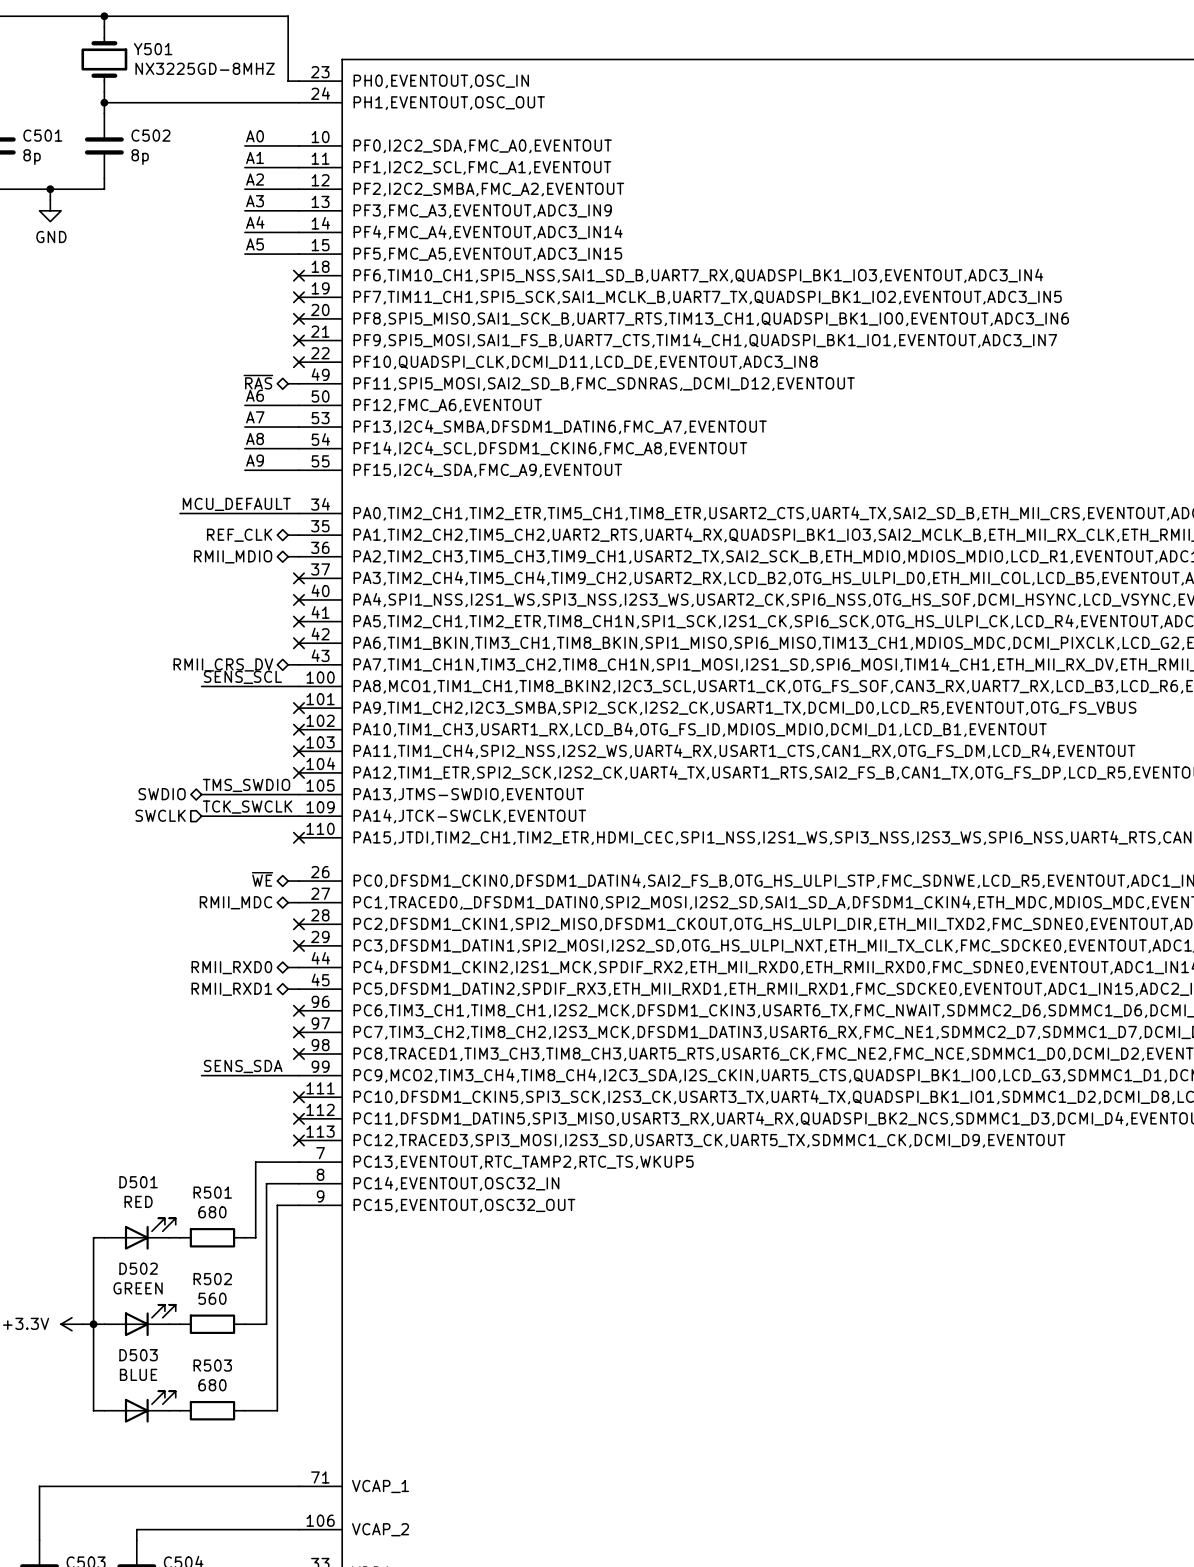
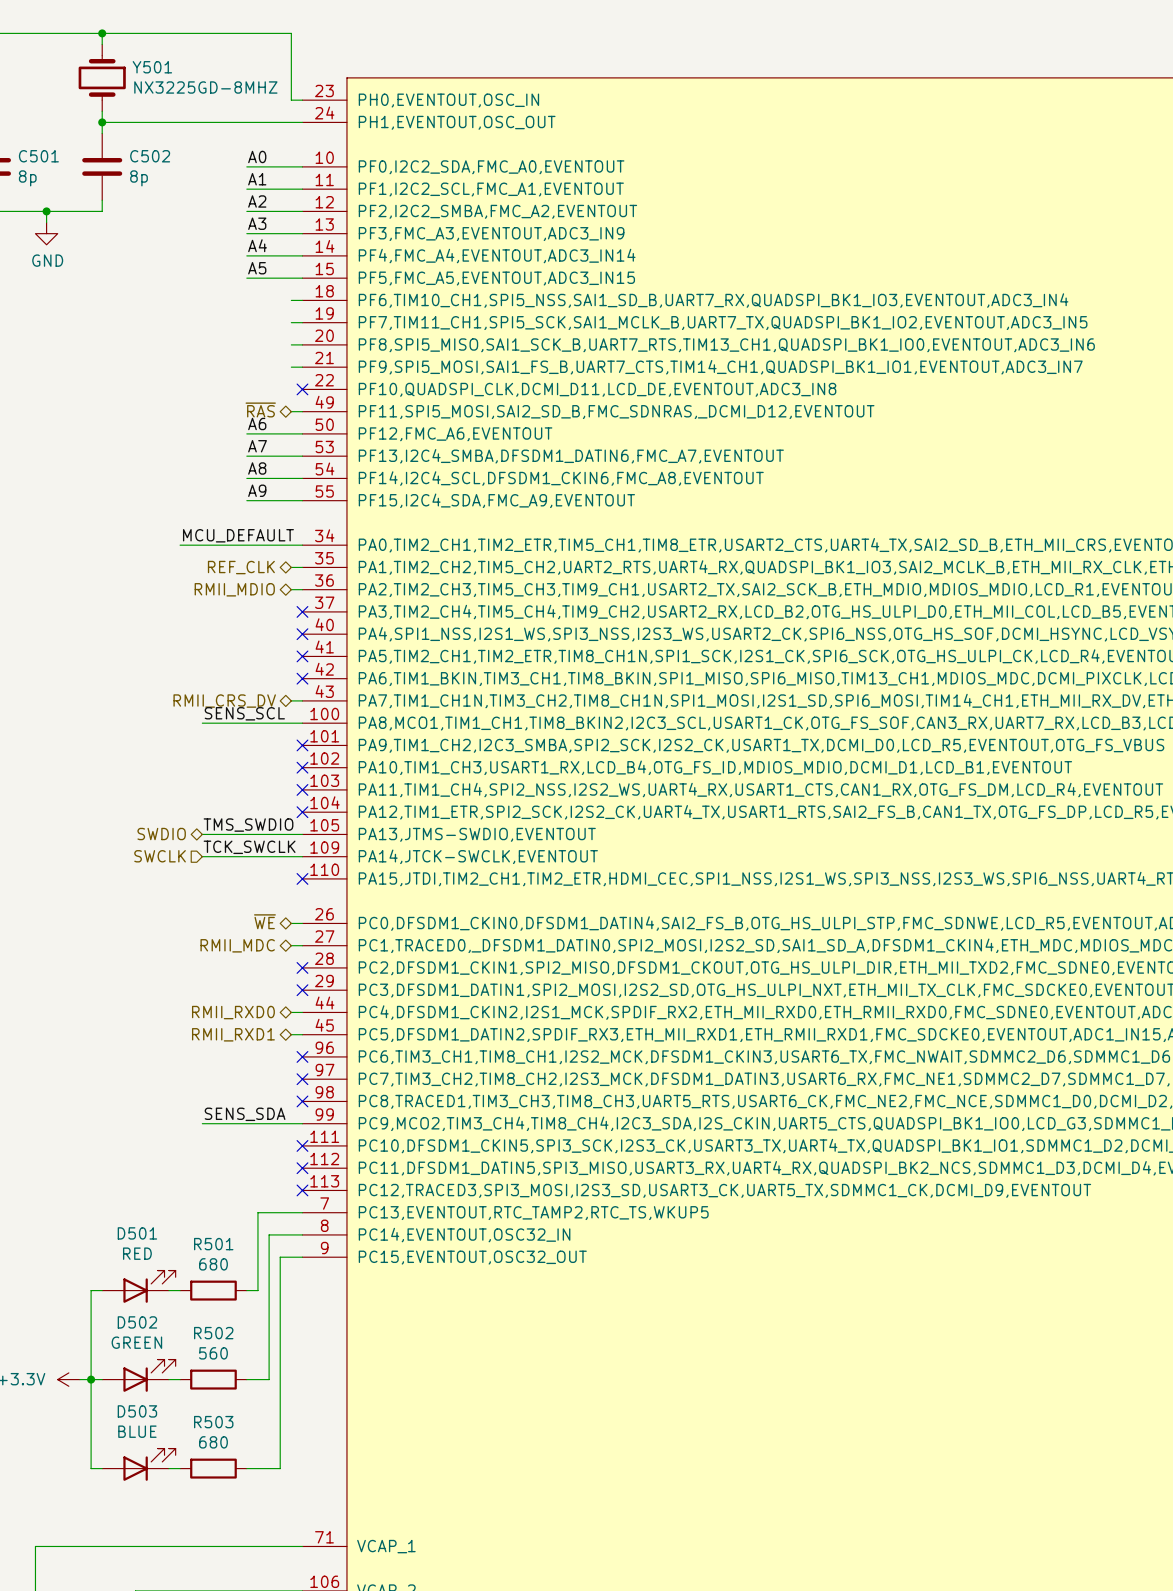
wire: none -> (291, 300) (302, 300)
no-connect mark: (298, 275) -> none
wire: none -> (291, 322) (302, 322)
no-connect mark: (298, 297) -> none
wire: none -> (291, 344) (302, 344)
no-connect mark: (298, 318) -> none
wire: none -> (291, 367) (302, 367)
no-connect mark: (298, 340) -> none

